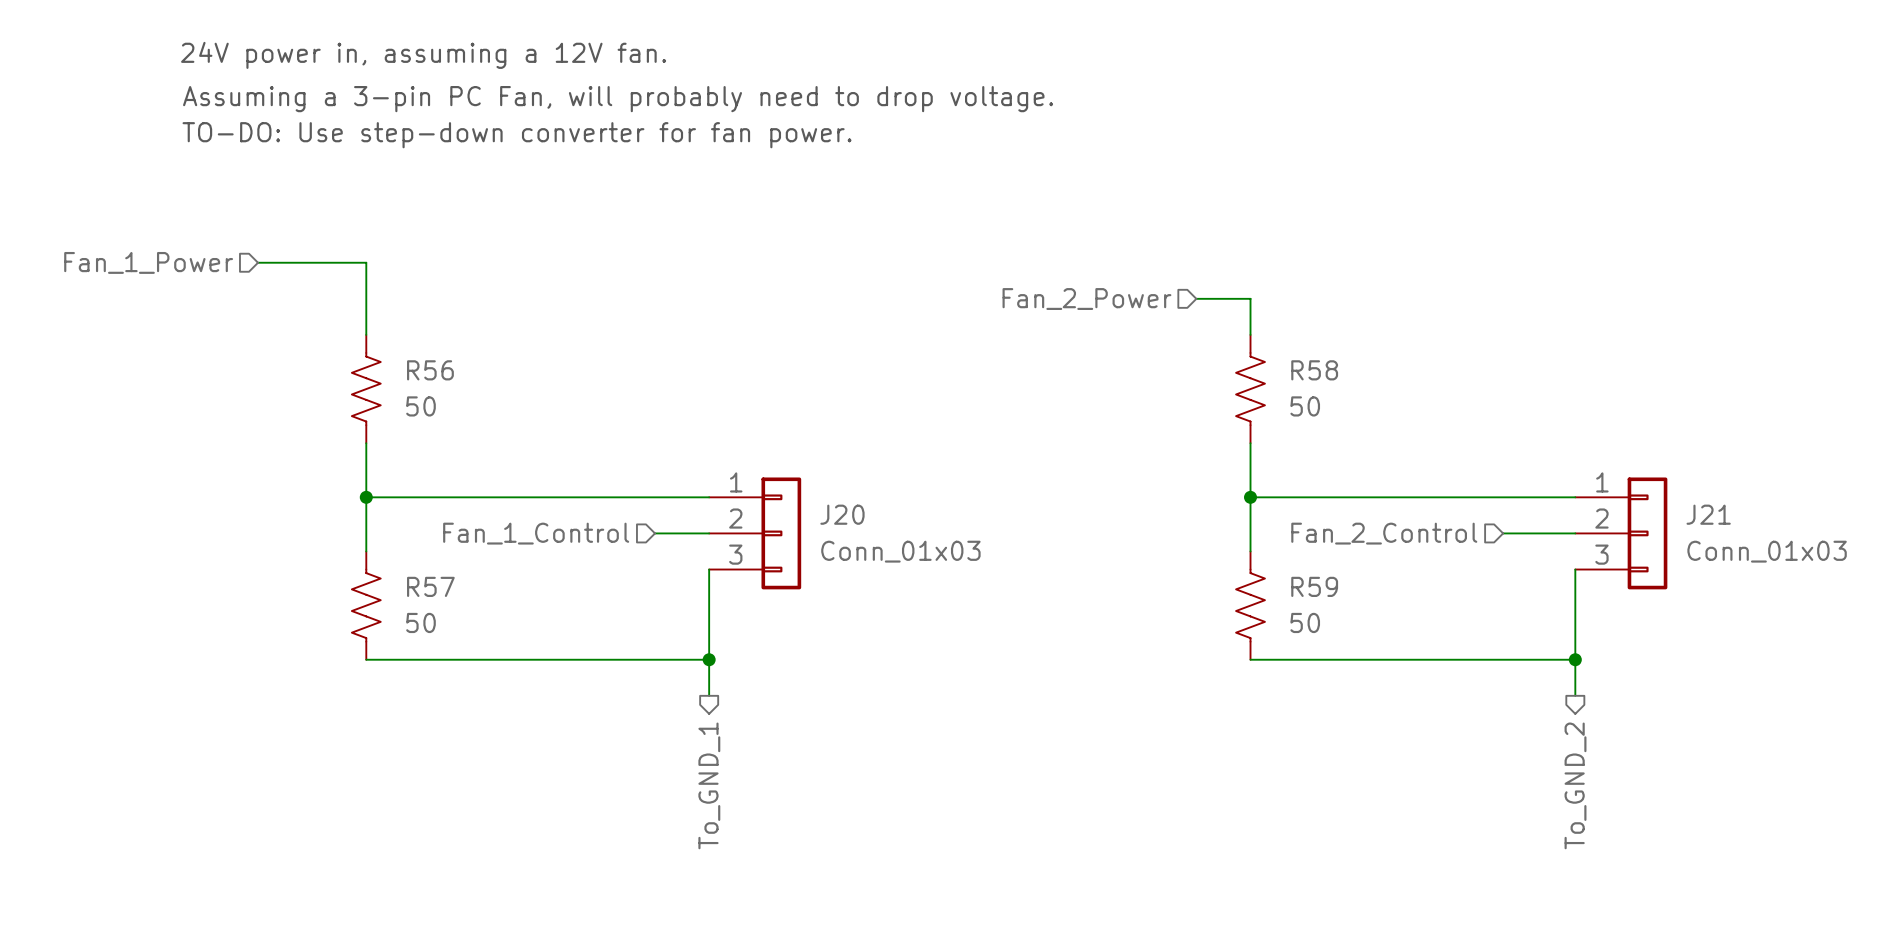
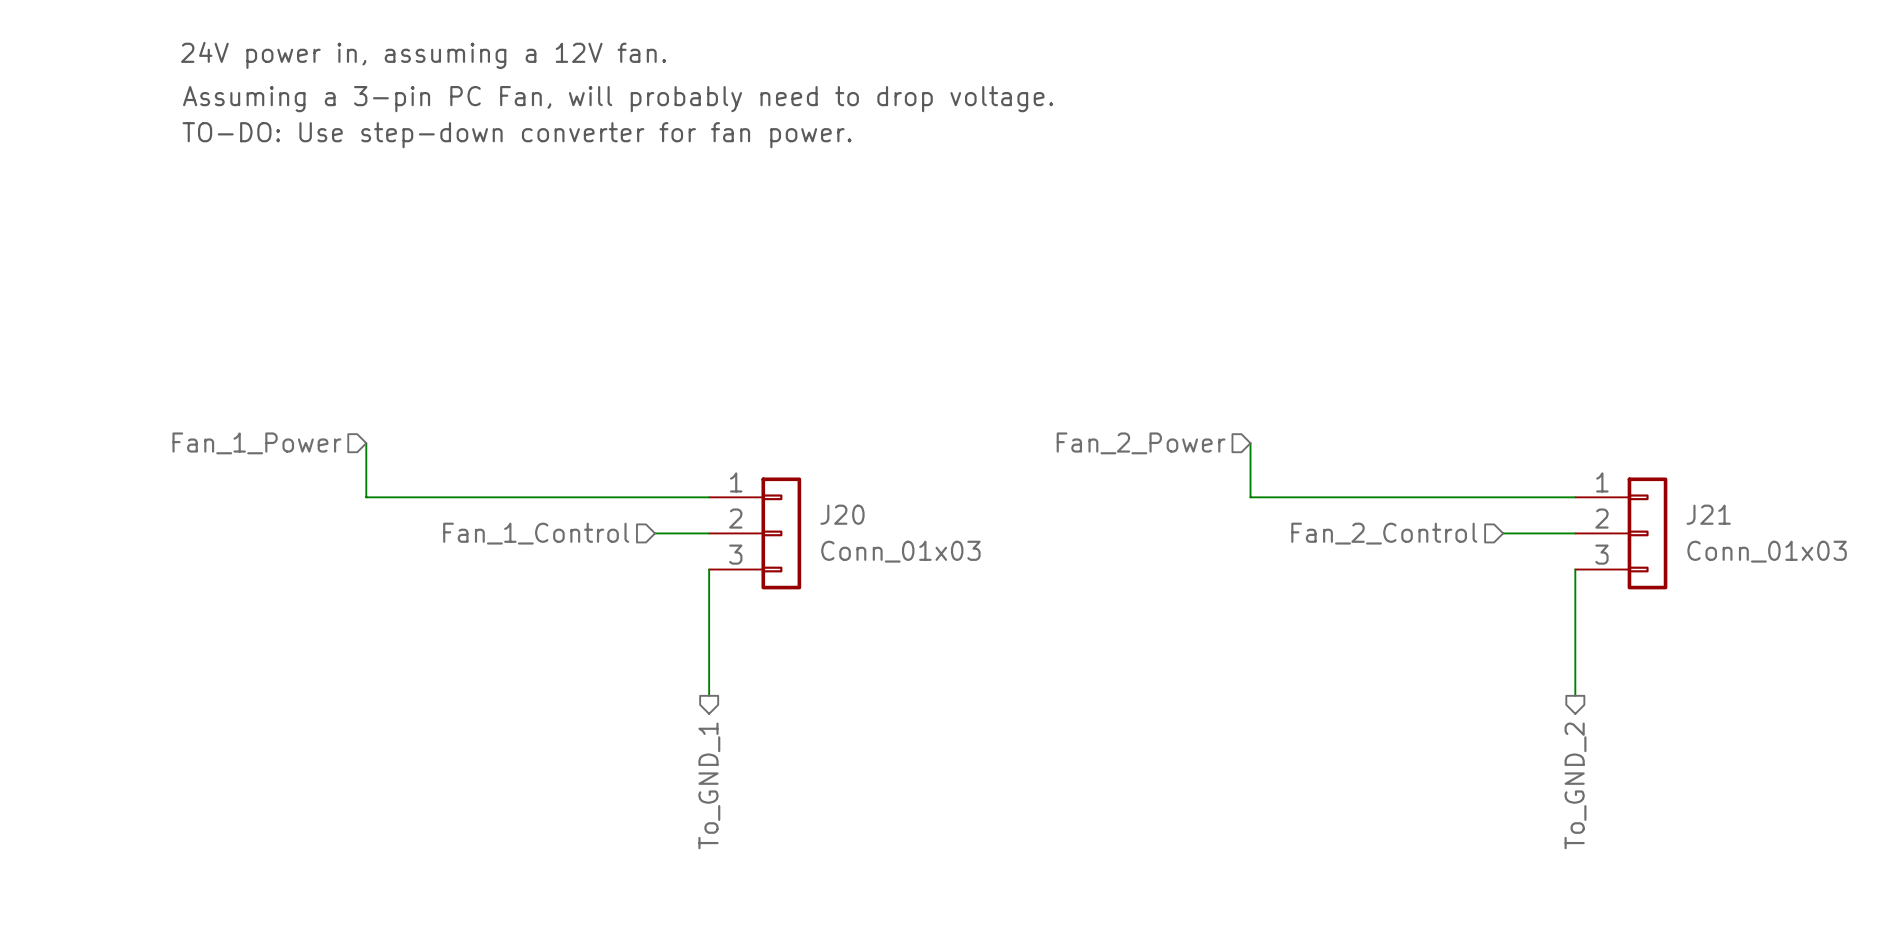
hierarchical label position: Fan_1_Power (148, 262) -> Fan_1_Power (256, 443)
wire: (258, 262) (366, 262) (366, 334) -> none
wire: (1196, 298) (1250, 298) (1250, 334) -> none
hierarchical label position: Fan_2_Power (1086, 299) -> Fan_2_Power (1141, 443)
R56: 50 (366, 389) -> none
R58: 50 (1250, 389) -> none
wire: (366, 497) (366, 551) -> none
junction: (366, 497) -> none
wire: (1250, 497) (1250, 551) -> none
junction: (1250, 497) -> none
R57: 50 (366, 605) -> none
R59: 50 (1250, 605) -> none
wire: (366, 659) (709, 659) -> none
junction: (709, 659) -> none
wire: (1250, 659) (1575, 659) -> none
junction: (1575, 659) -> none

